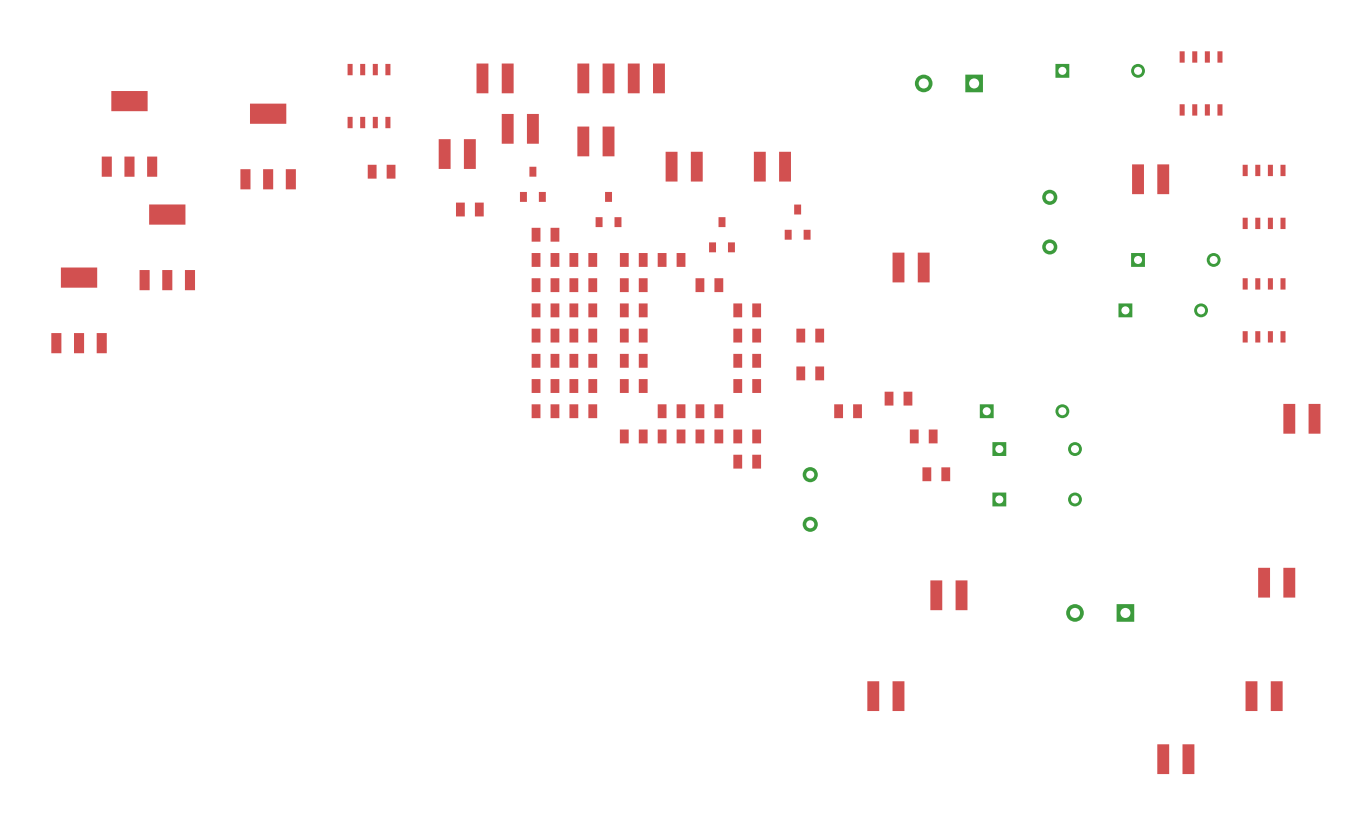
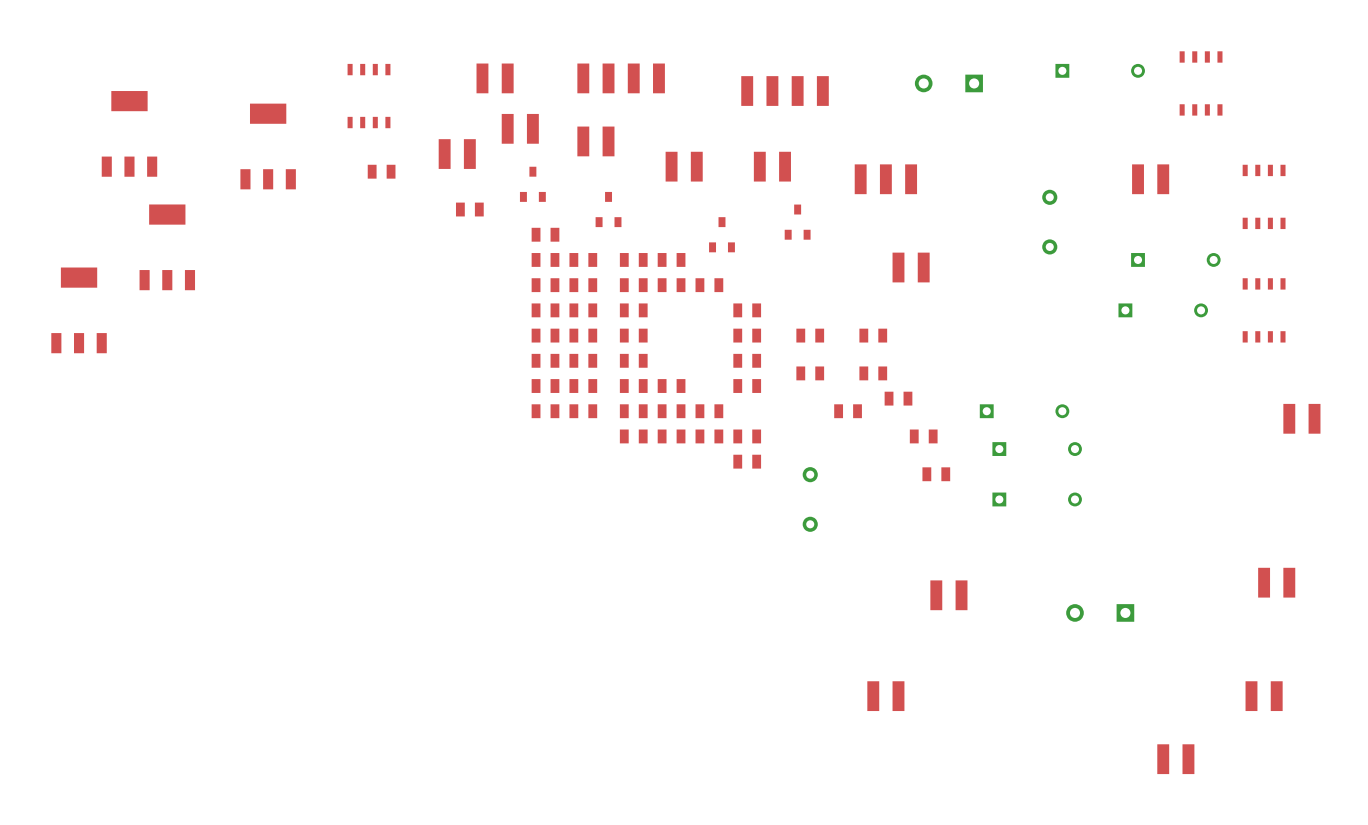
part: none -> (785, 91)
part: none -> (885, 179)
part: none -> (671, 285)
part: none -> (873, 335)
part: none -> (873, 373)
part: none -> (671, 386)
part: none -> (633, 411)

